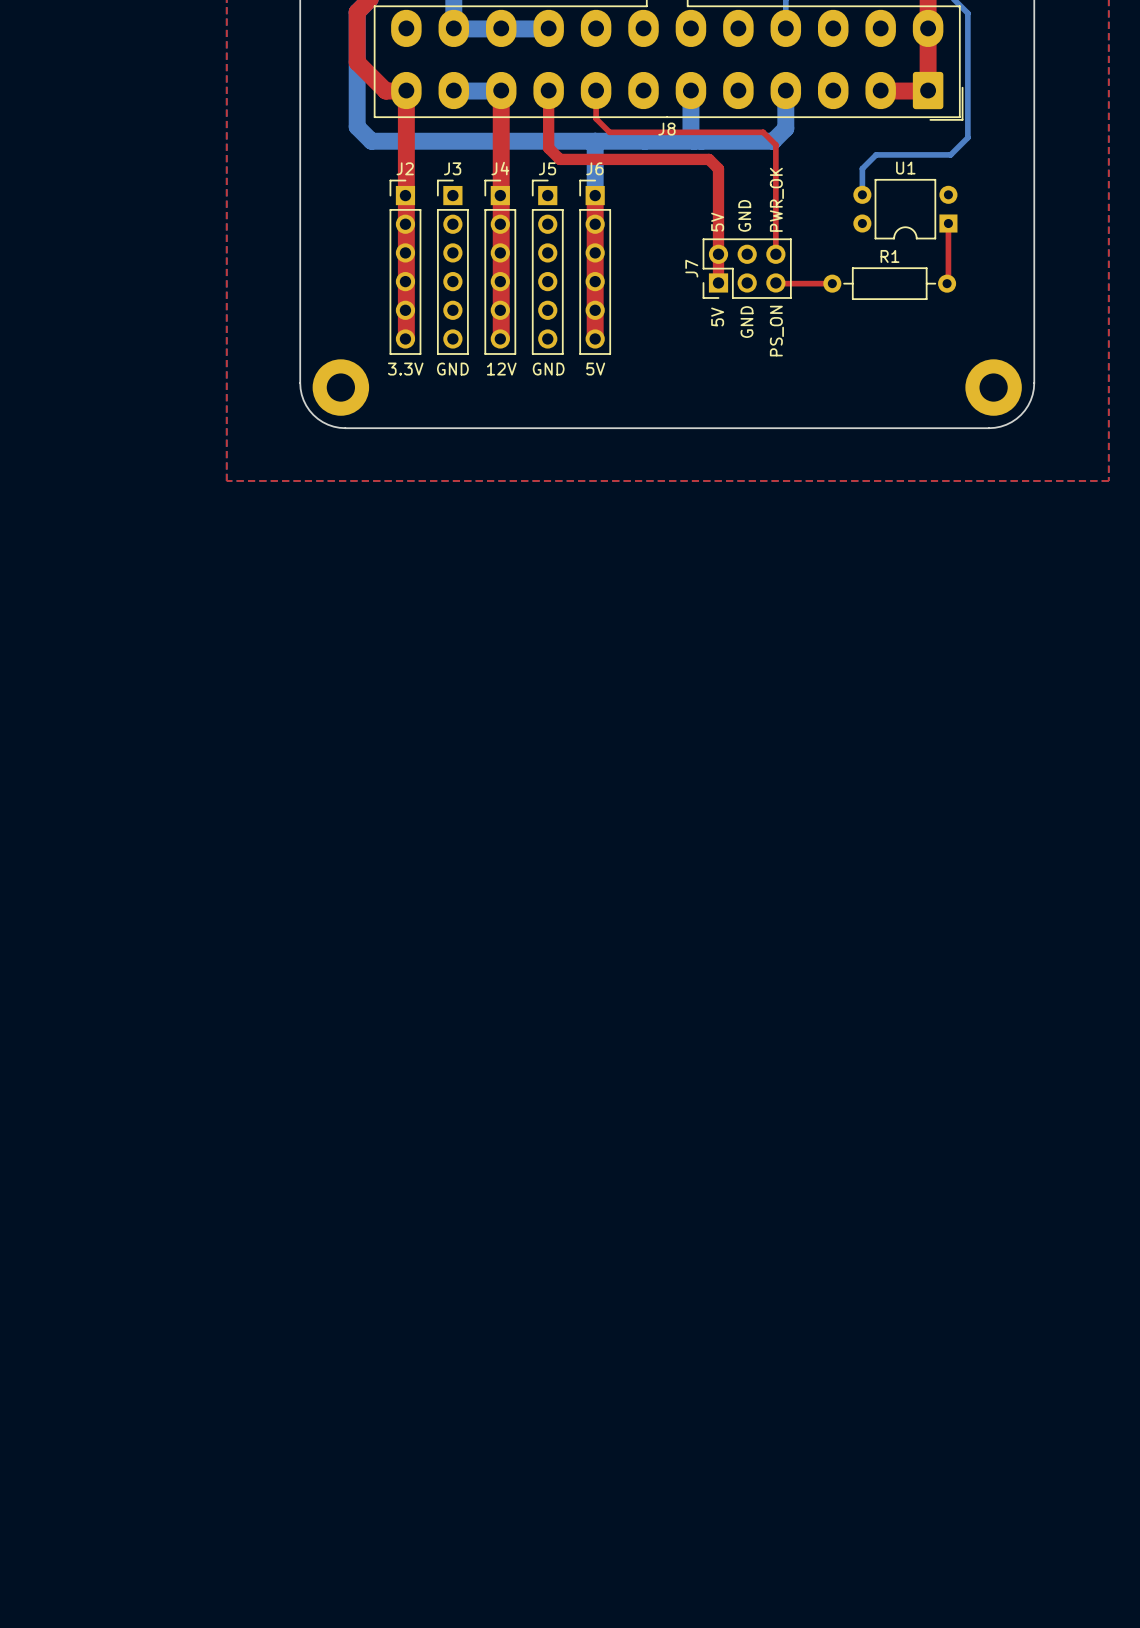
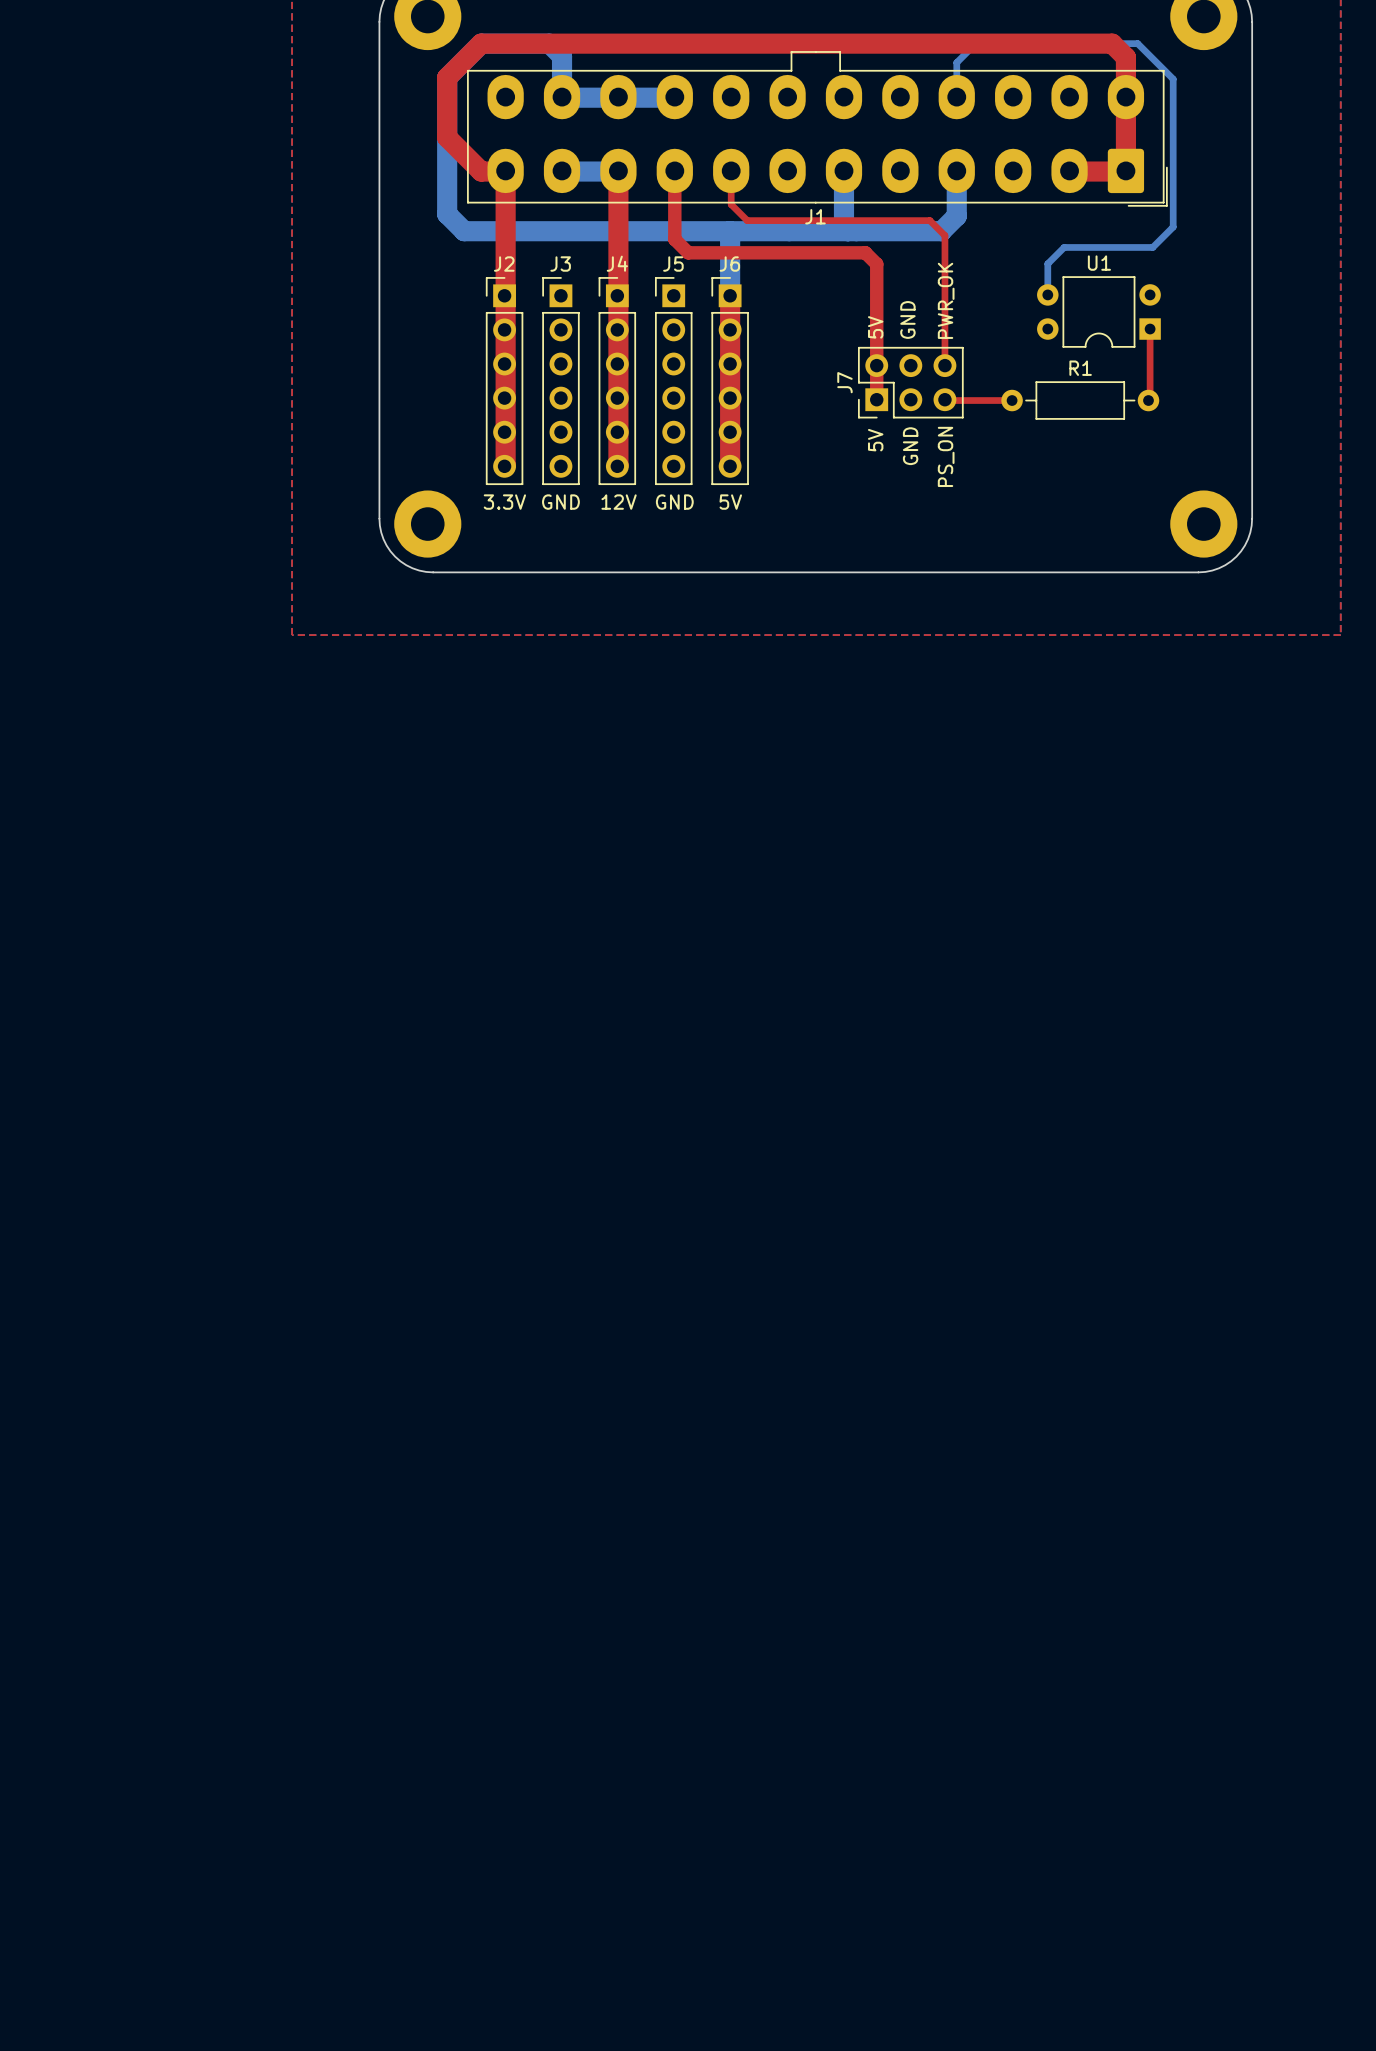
J8 name: J8 (666, 129) -> J1 (815, 216)

